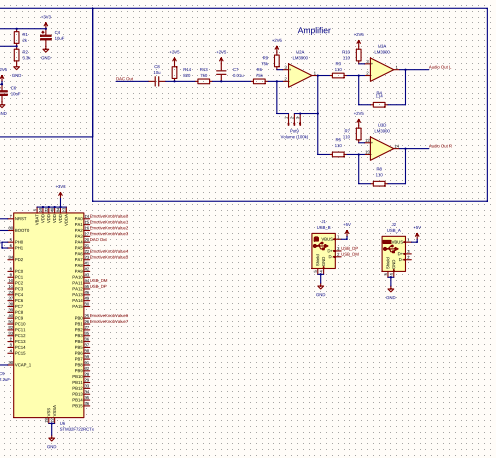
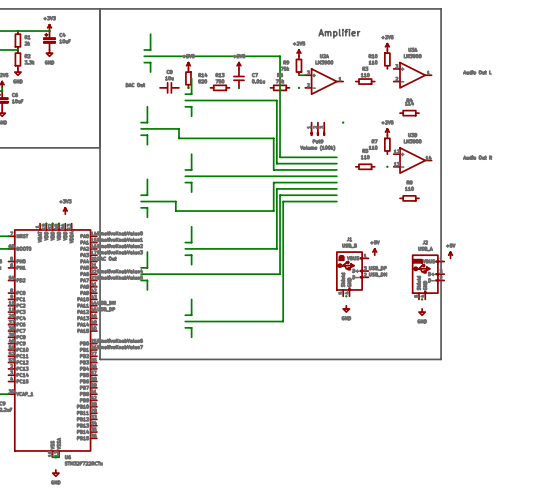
line: (408, 8) (487, 8) (487, 201) (92, 201) -> (441, 8) (441, 359) (100, 359) (100, 217)
wire: none -> (150, 34) (150, 49) (144, 49)
wire: none -> (144, 56) (280, 56) (280, 157) (336, 157)
wire: none -> (144, 62) (150, 62) (150, 72)
wire: (358, 63) (364, 63) -> none
wire: (399, 69) (428, 69) -> none
wire: (405, 69) (405, 104) (387, 104) -> none
wire: none -> (191, 78) (191, 94) (185, 94)
wire: (329, 75) (317, 75) (317, 154) (329, 154) -> none
wire: (347, 75) (364, 75) -> none
wire: (358, 75) (358, 104) (370, 104) -> none
wire: (116, 81) (148, 81) -> none
wire: (165, 81) (194, 81) -> none
wire: (212, 81) (250, 81) -> none
wire: (268, 81) (282, 81) -> none
wire: (276, 81) (276, 113) (288, 113) -> none
wire: none -> (185, 100) (276, 100) (276, 163) (336, 163)
wire: none -> (147, 106) (147, 122) (141, 122)
wire: none -> (185, 106) (191, 106) (191, 116)
wire: (294, 113) (317, 113) -> none
wire: none -> (141, 128) (178, 128) (178, 138) (273, 138) (273, 169) (336, 169)
wire: none -> (141, 135) (147, 135) (147, 144)
wire: none -> (191, 154) (191, 169) (185, 169)
wire: (358, 142) (364, 142) -> none
wire: (399, 148) (428, 148) -> none
wire: (405, 148) (405, 183) (387, 183) -> none
wire: (347, 154) (364, 154) -> none
wire: (358, 154) (358, 183) (370, 183) -> none
wire: none -> (185, 176) (336, 176)
wire: none -> (147, 179) (147, 195) (141, 195)
wire: none -> (185, 182) (191, 182) (191, 192)
wire: none -> (336, 182) (273, 182) (273, 211) (175, 211) (175, 201) (141, 201)
wire: none -> (336, 188) (276, 188) (276, 248) (185, 248)
wire: none -> (336, 195) (280, 195) (280, 274) (141, 274)
wire: none -> (336, 201) (283, 201) (283, 321) (185, 321)
wire: none -> (141, 207) (147, 207) (147, 217)
wire: (60, 198) (60, 207) -> none
wire: (37, 207) (66, 207) -> none
wire: none -> (191, 226) (191, 242) (185, 242)
wire: none -> (147, 252) (147, 267) (141, 267)
wire: none -> (185, 255) (191, 255) (191, 264)
wire: (347, 236) (347, 239) (341, 239) -> none
wire: (417, 239) (417, 242) (411, 242) -> none
wire: (7, 242) (2, 242) (2, 248) (7, 248) -> none
wire: none -> (141, 280) (147, 280) (147, 289)
wire: (317, 274) (323, 274) -> none
wire: (320, 274) (320, 283) -> none
wire: none -> (191, 299) (191, 315) (185, 315)
wire: (387, 277) (393, 277) -> none
wire: (390, 277) (390, 286) -> none
wire: none -> (185, 327) (191, 327) (191, 337)
wire: (51, 423) (51, 435) -> none

